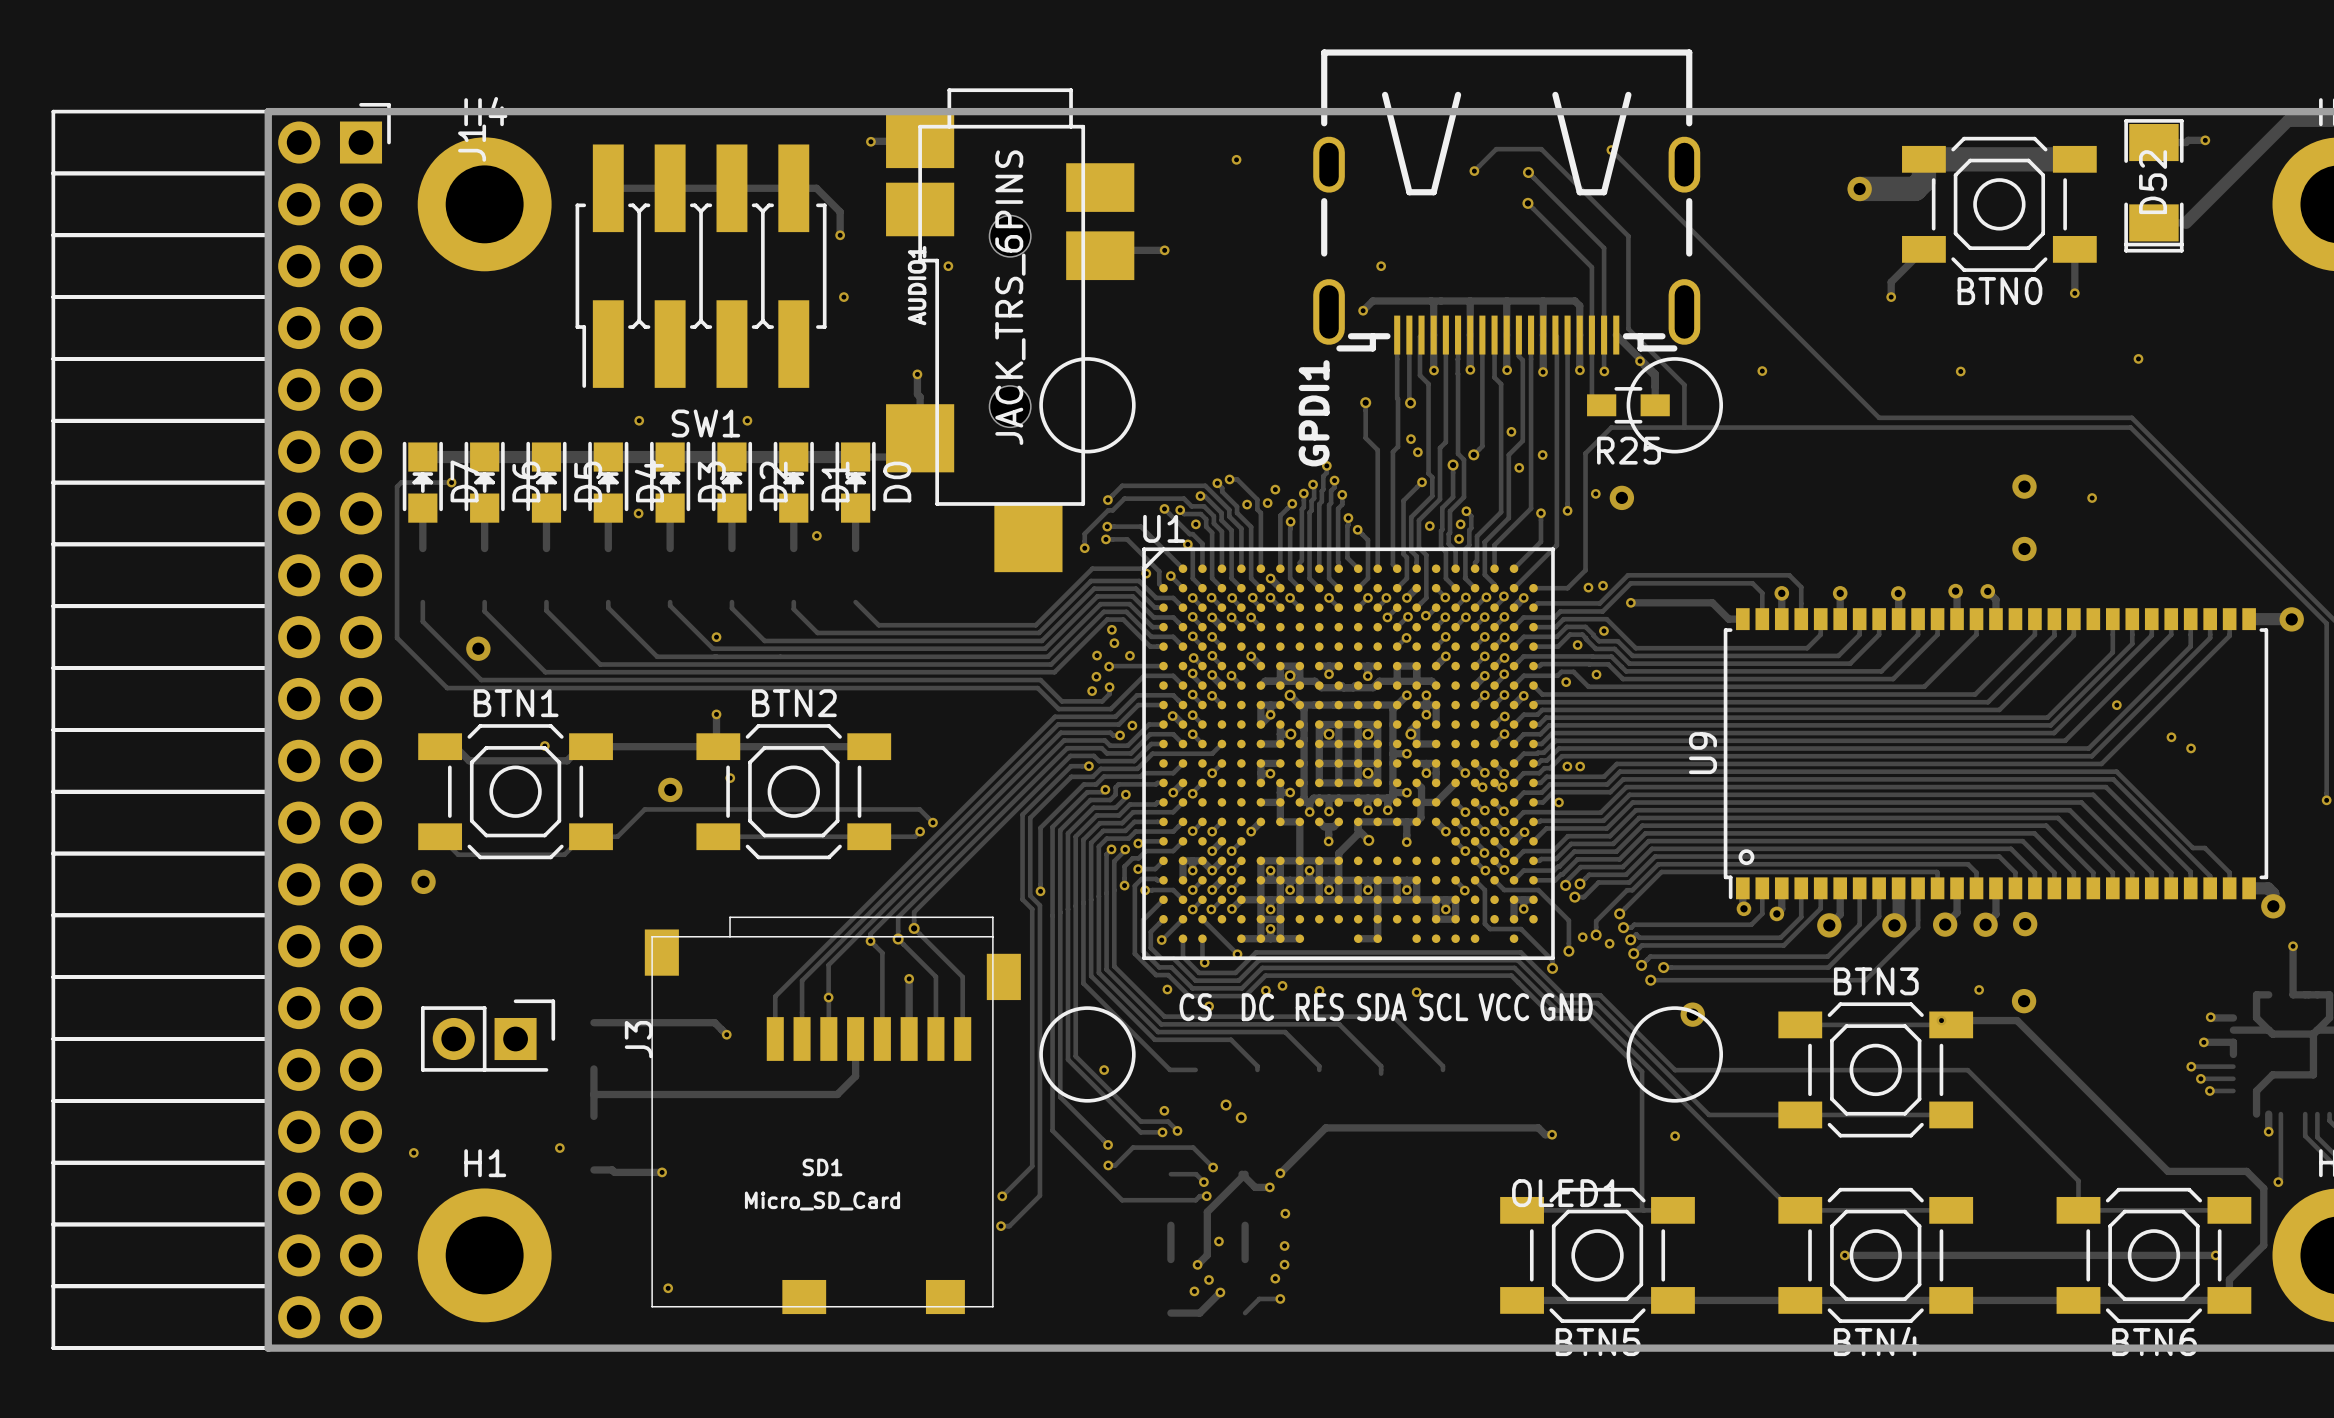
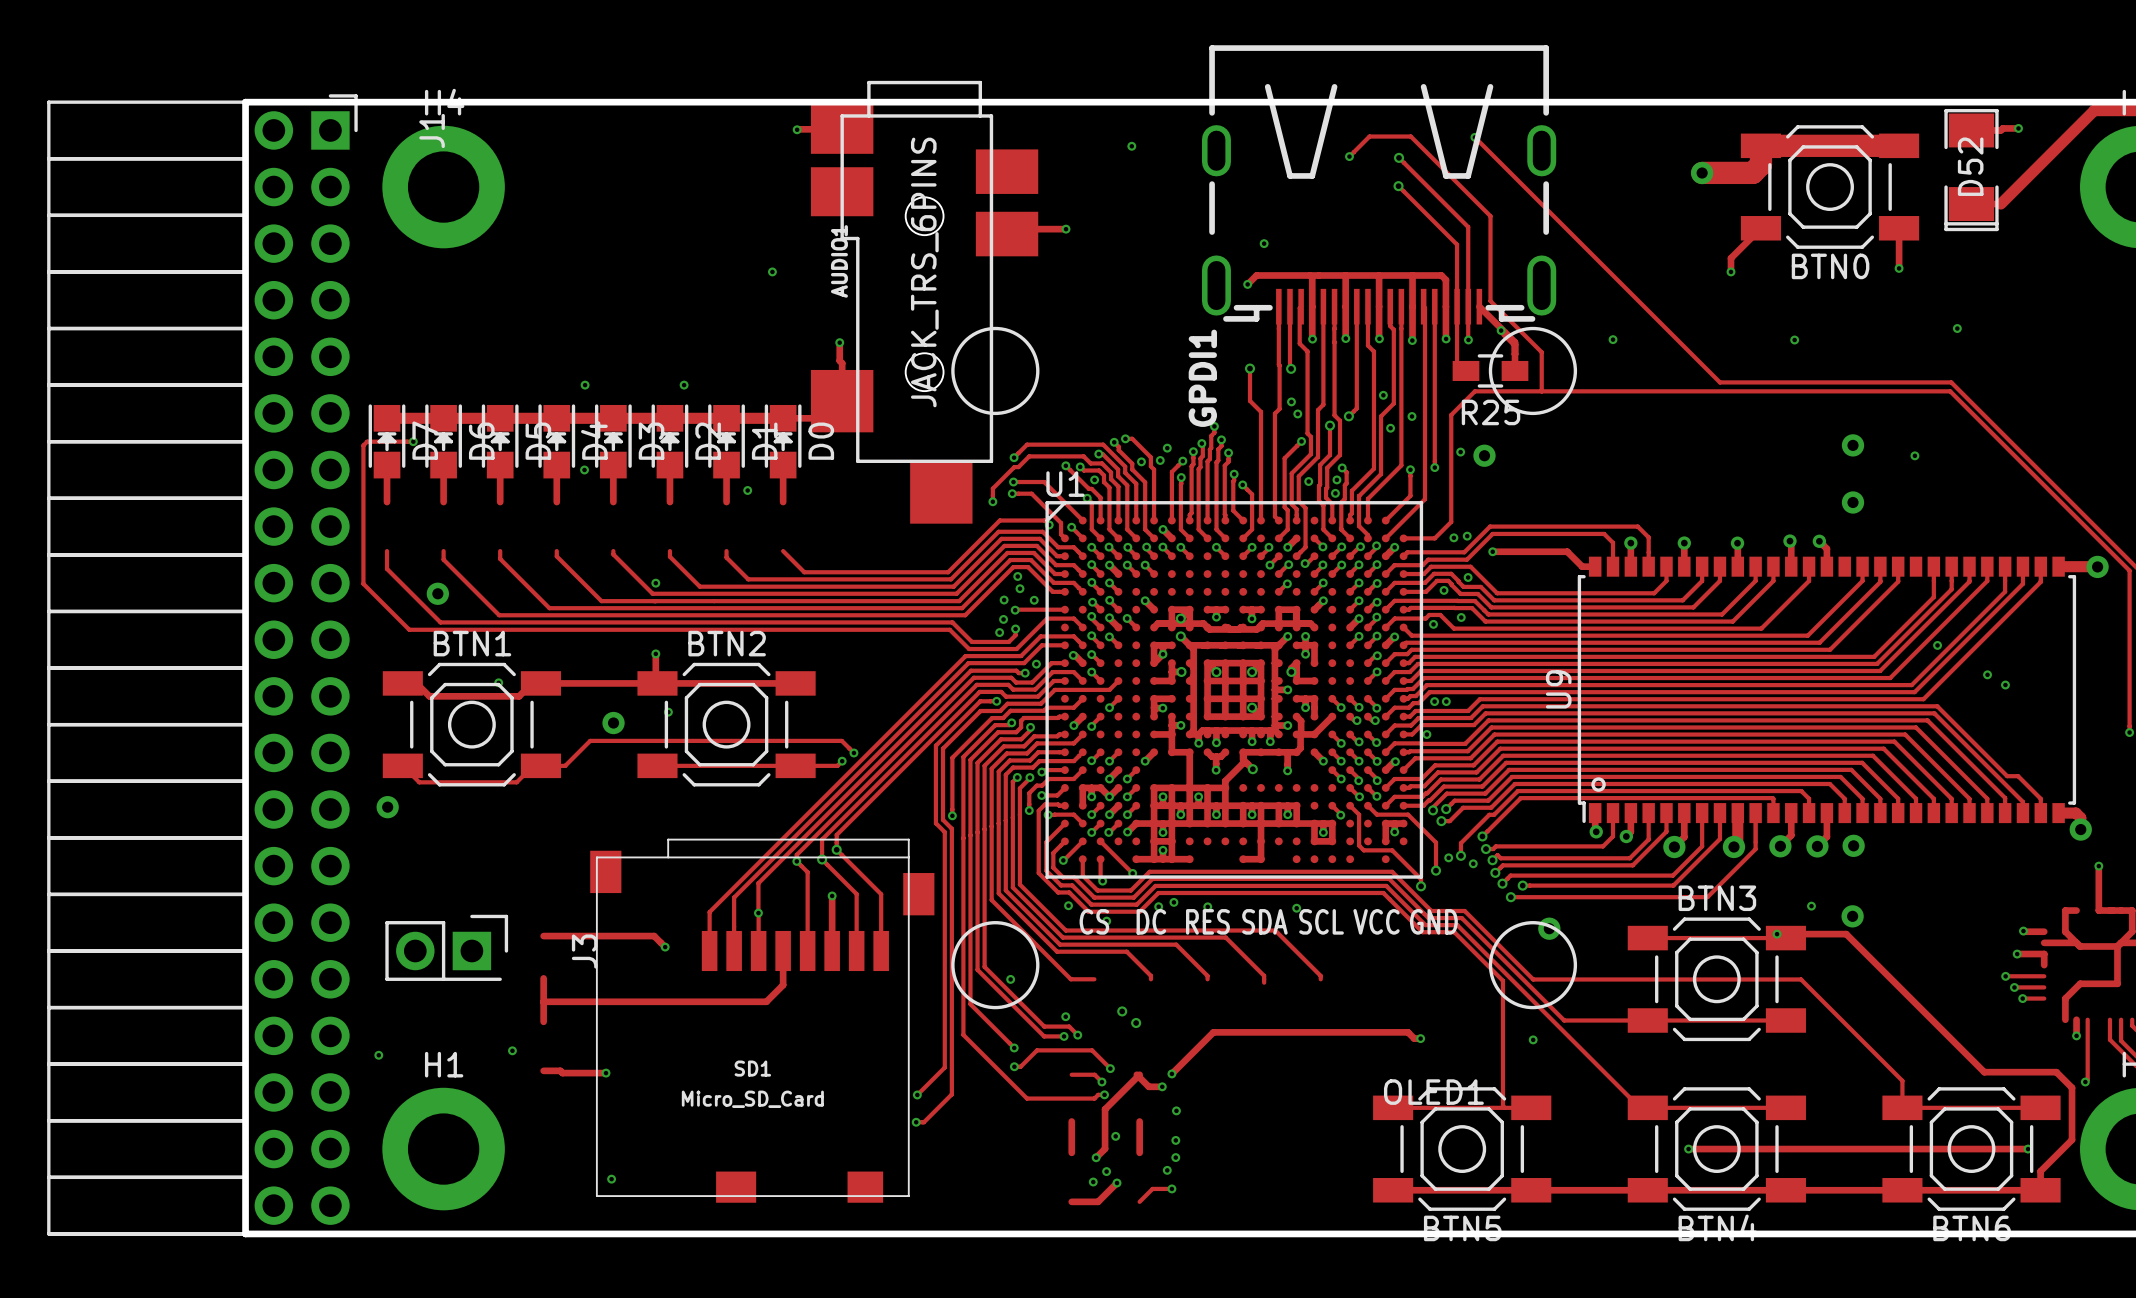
track: (608, 188) (816, 188) (840, 211) (840, 235) -> none
via: (840, 235) -> none
SW1: (701, 266) -> none
via: (948, 266) -> none

